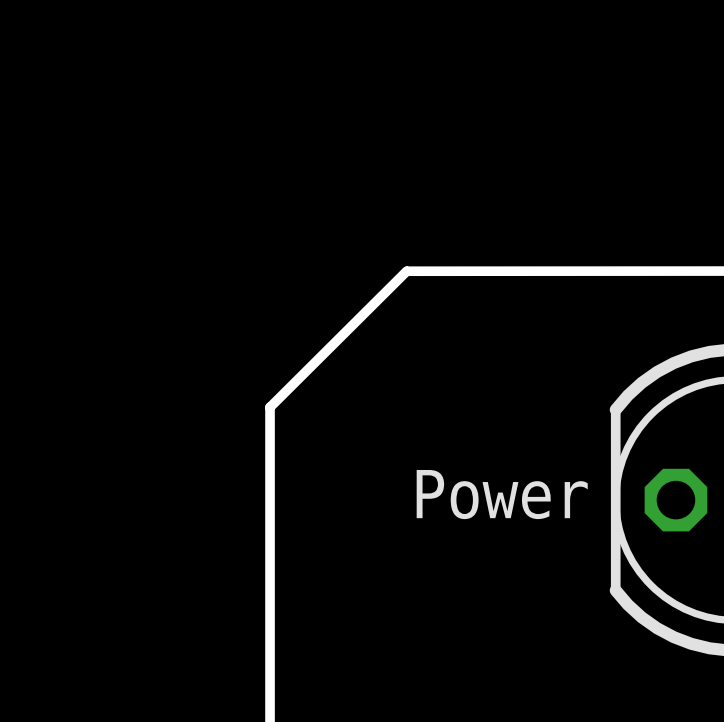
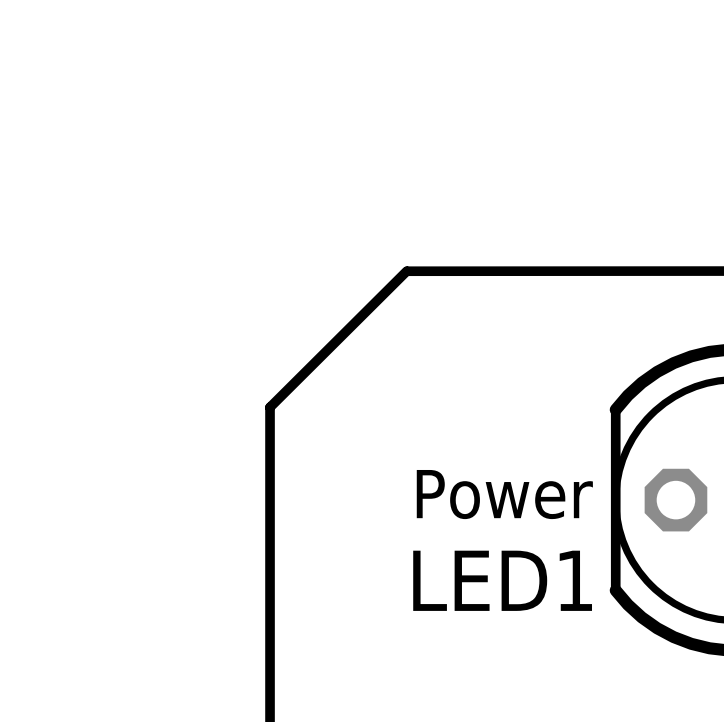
LED1 name: none -> LED1 (502, 580)

